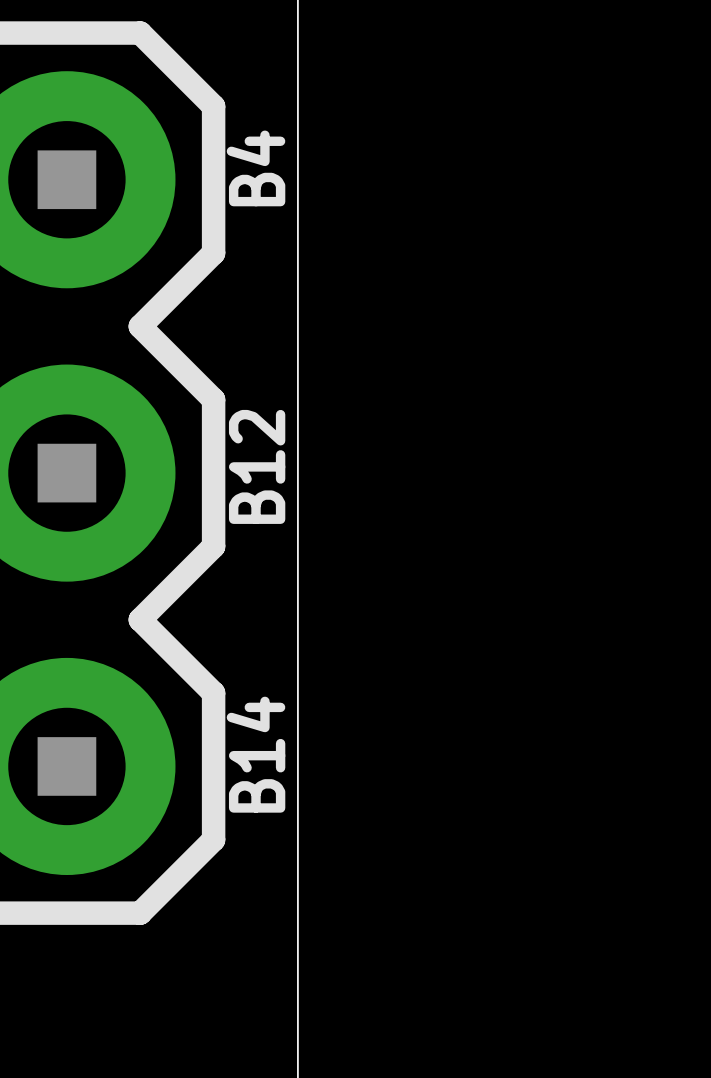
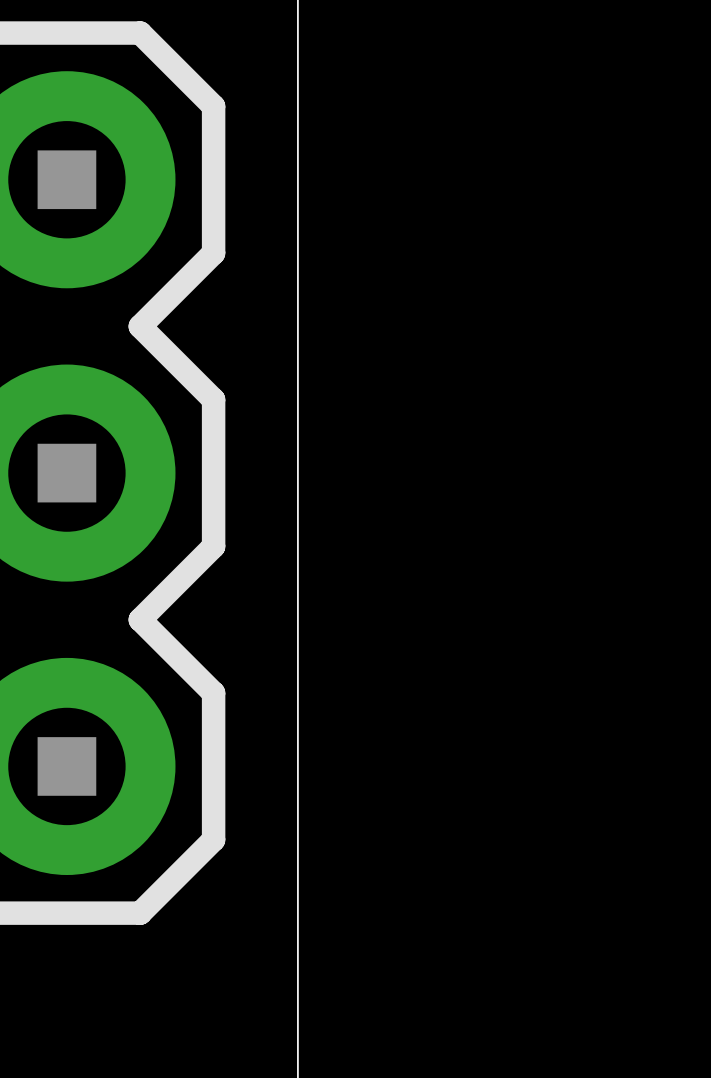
text: B4 (256, 168) -> none
text: B12 (257, 466) -> none
text: B14 (256, 754) -> none

